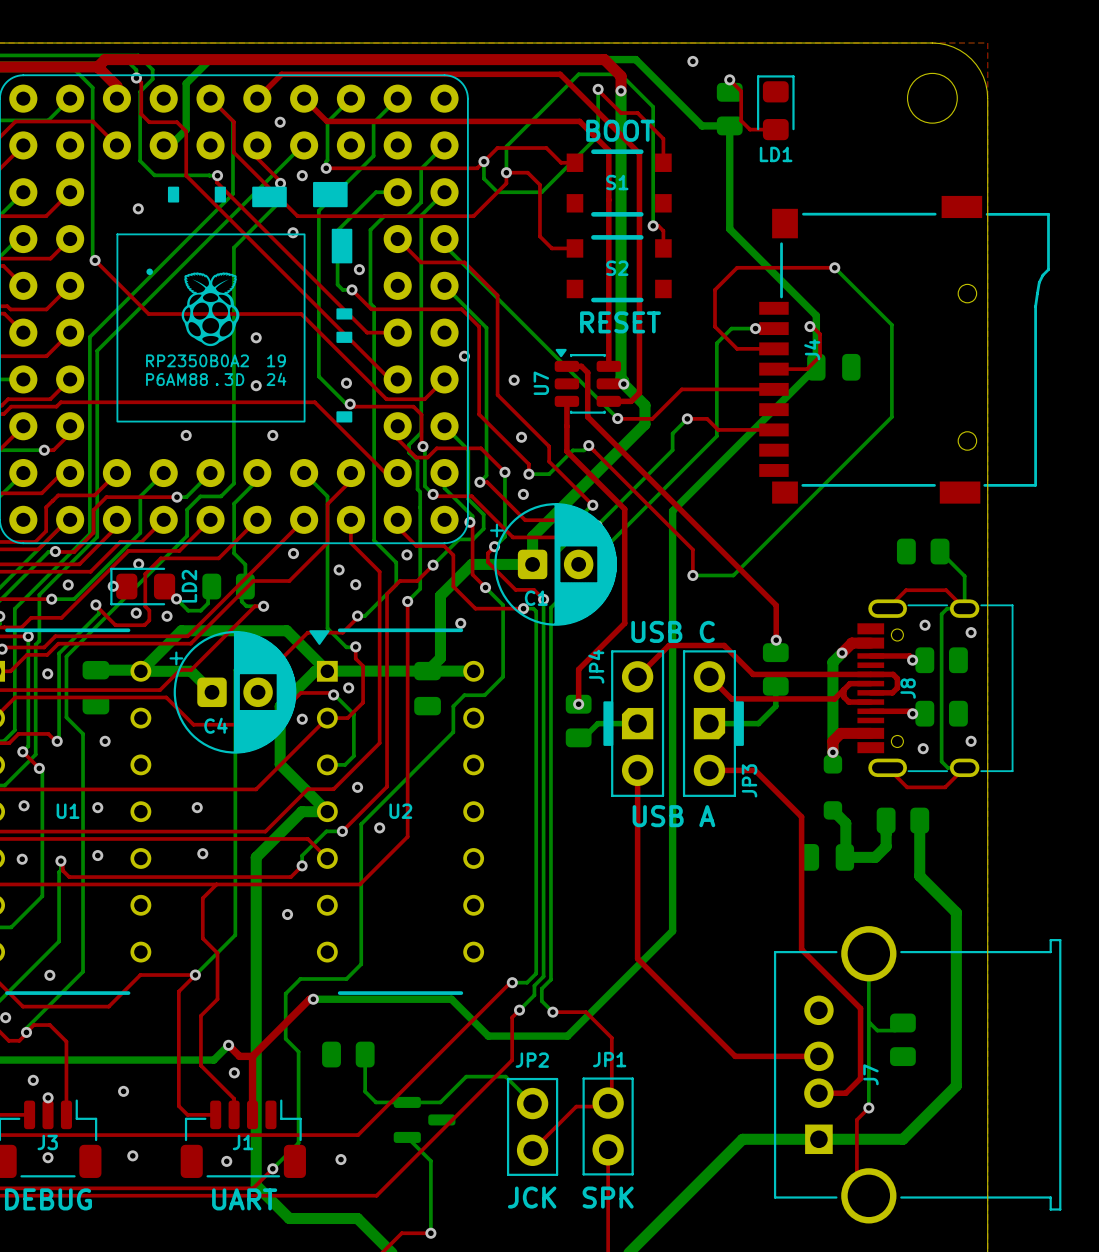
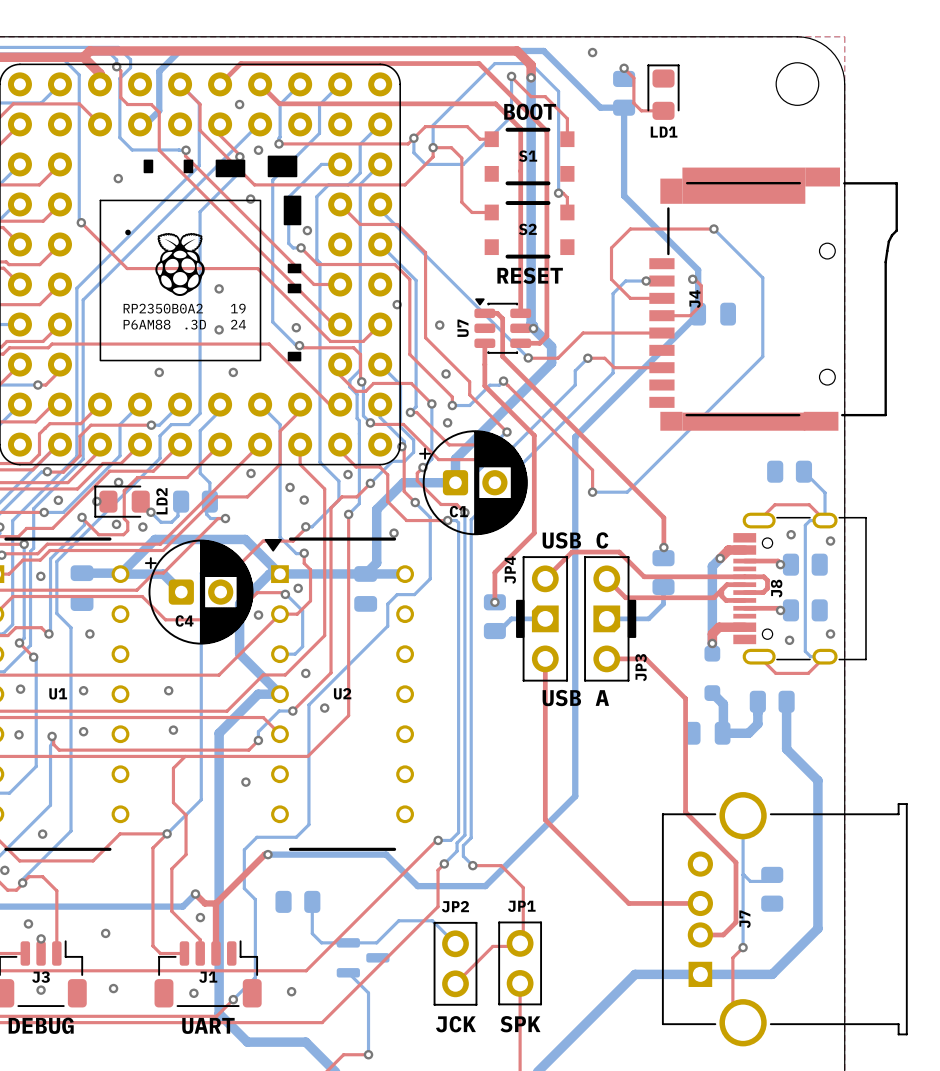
J4 footprint: [759, 195, 1050, 504] -> [649, 167, 898, 431]

